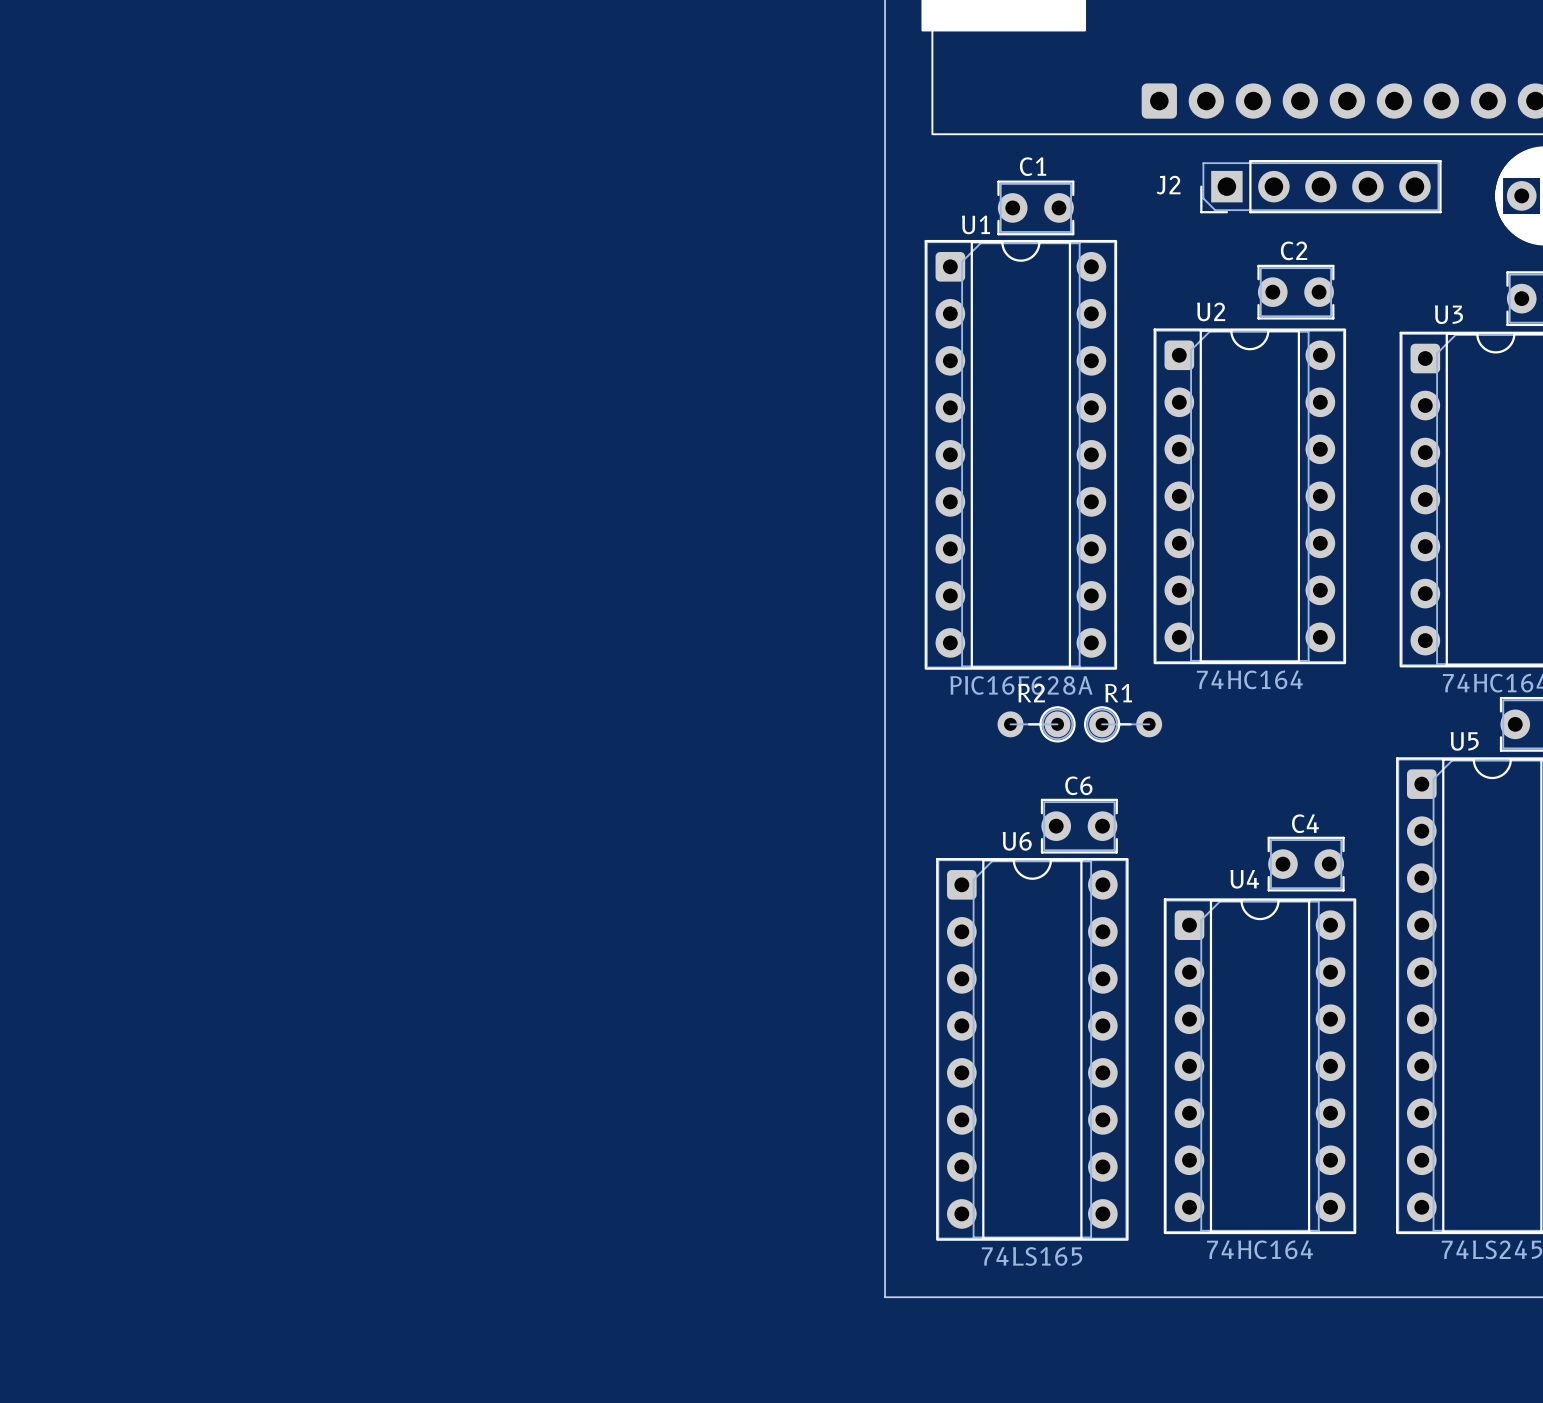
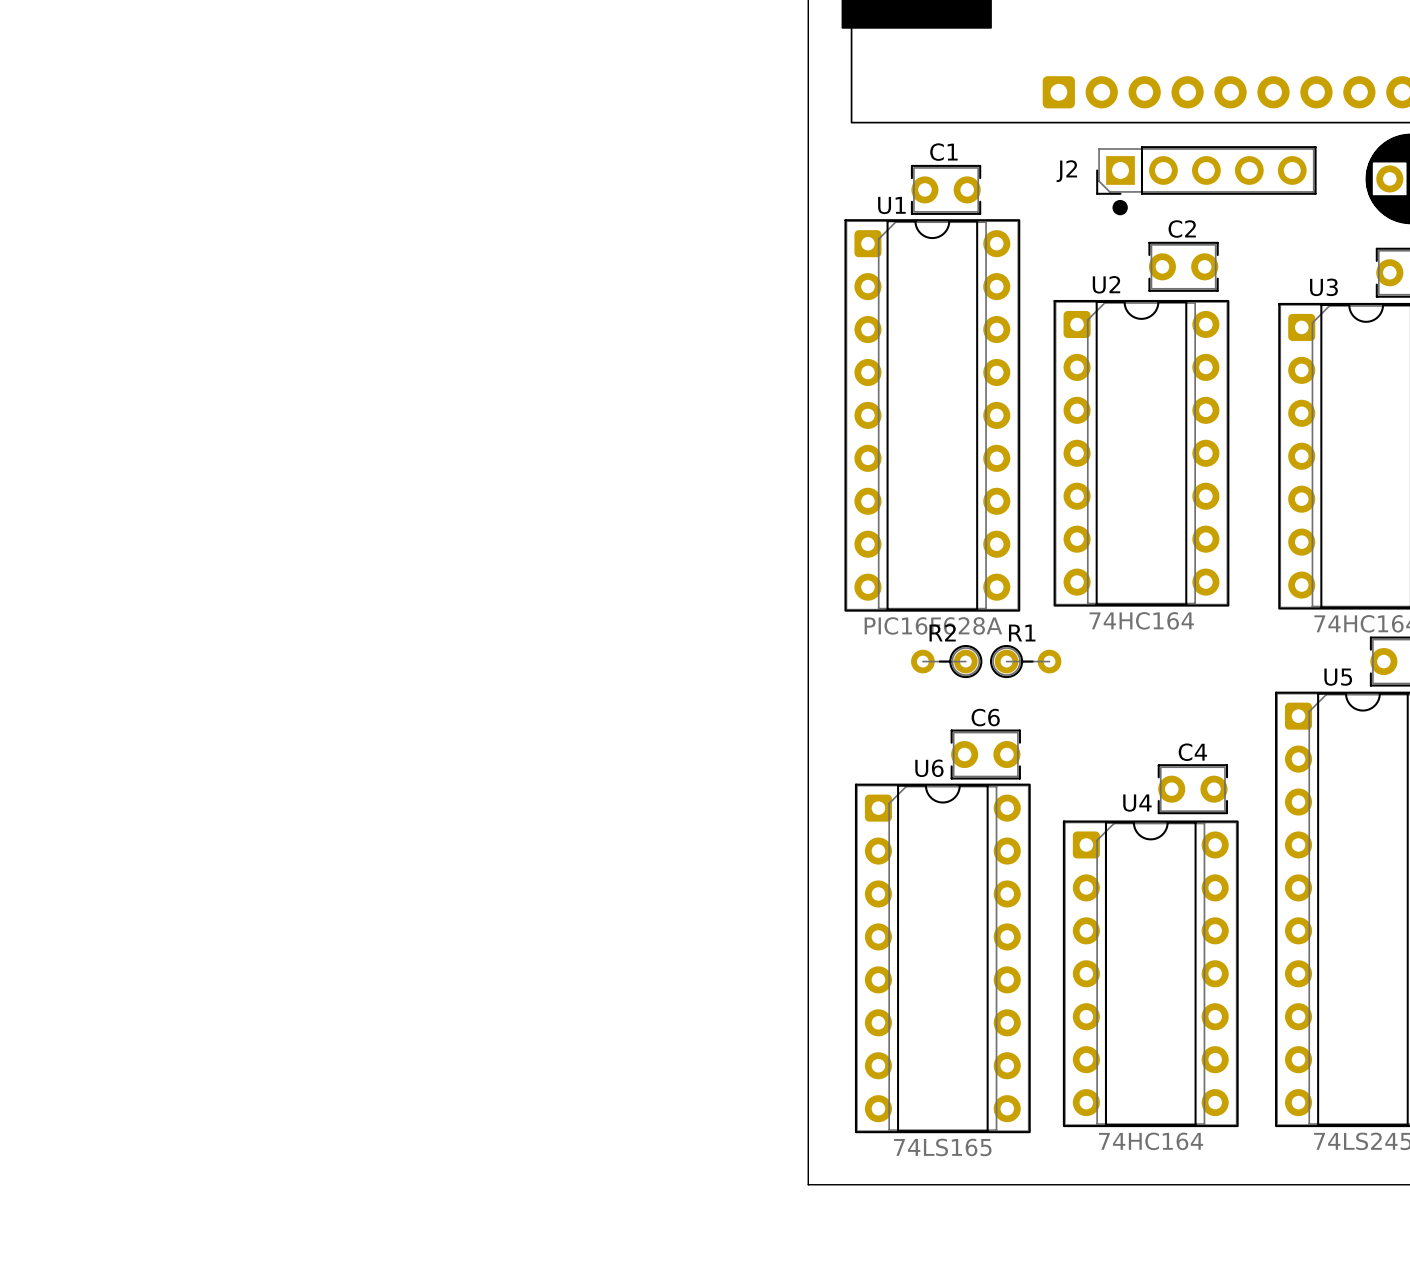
drawing: none -> [1112, 199, 1128, 216]

